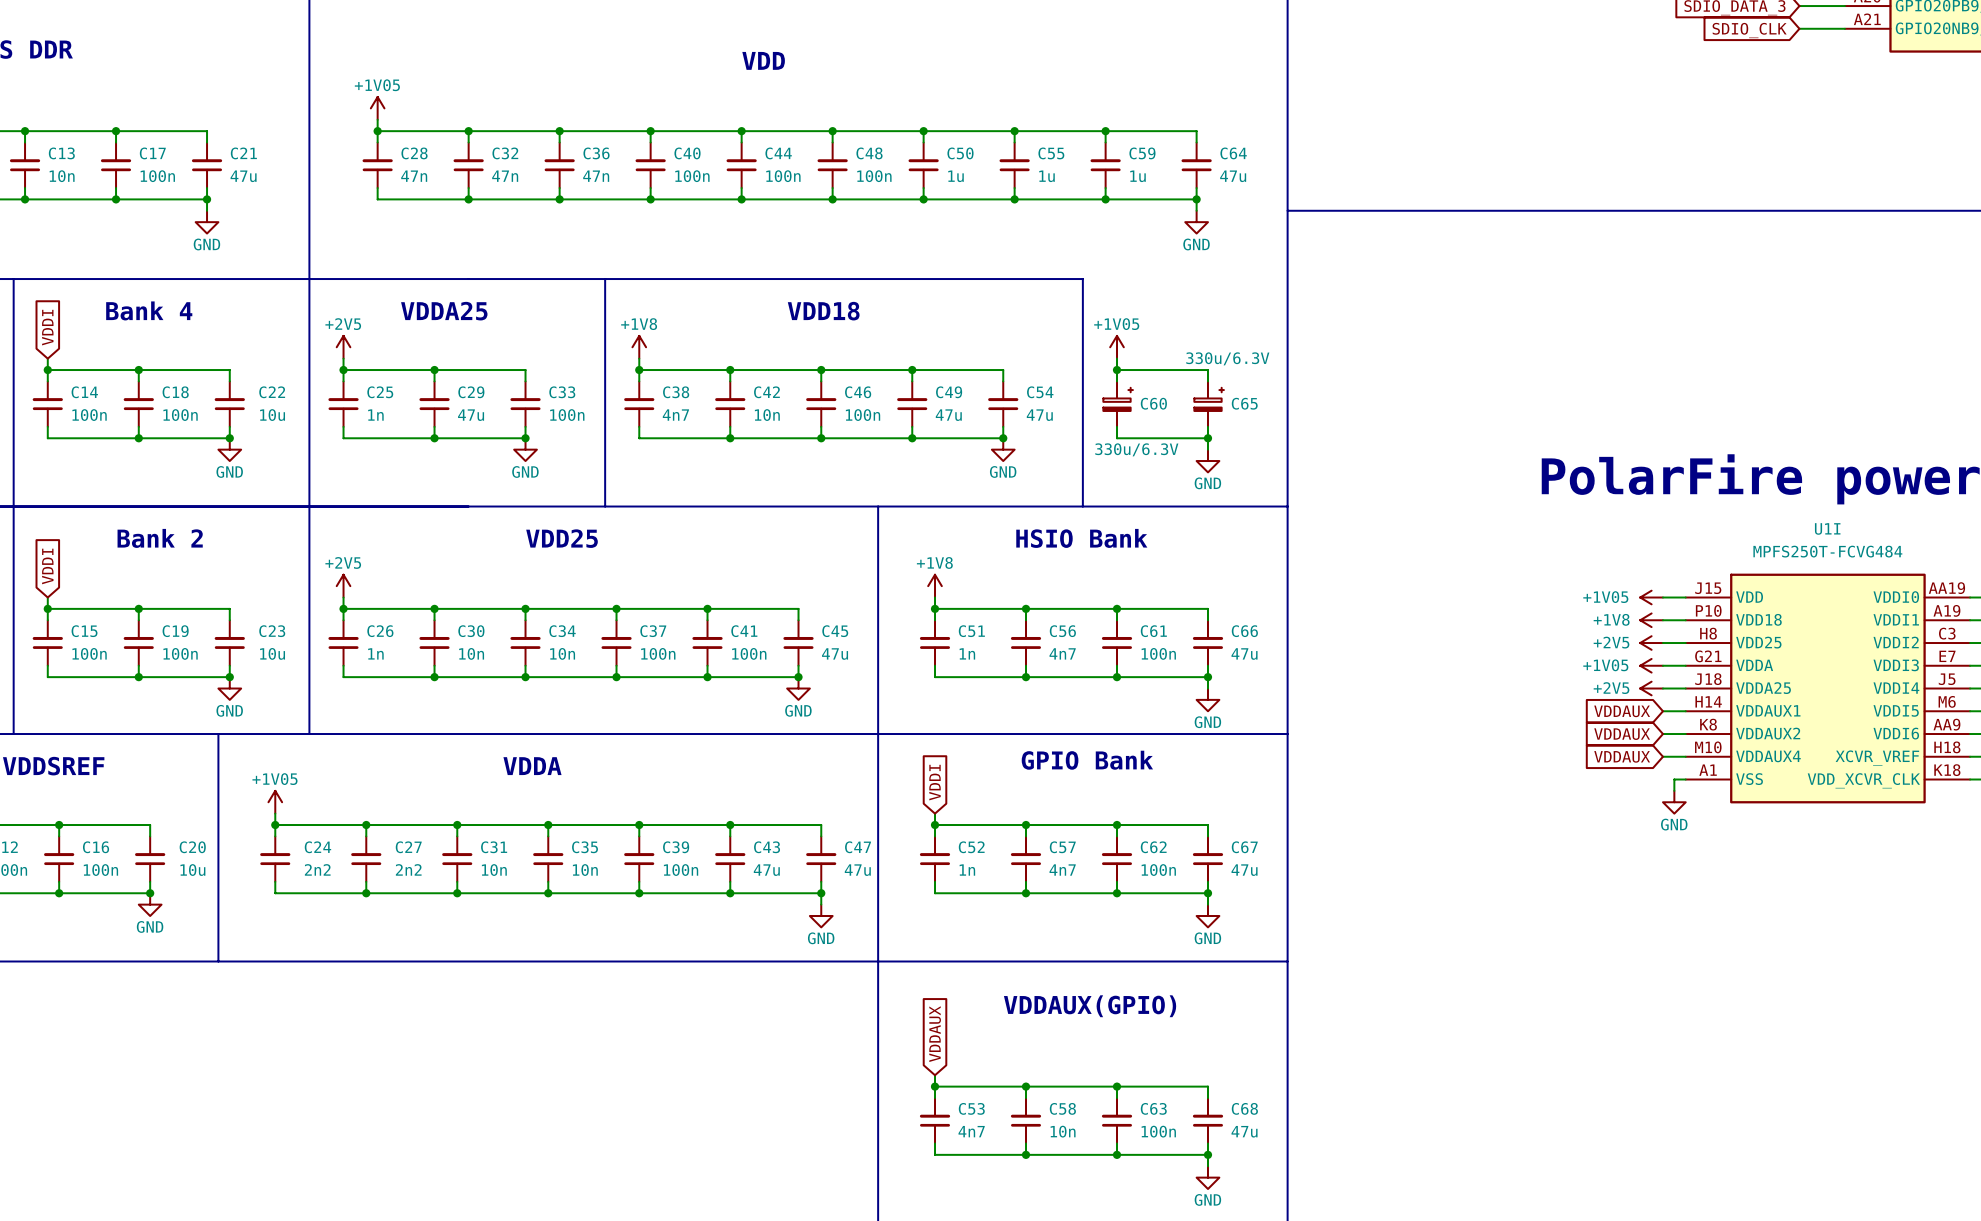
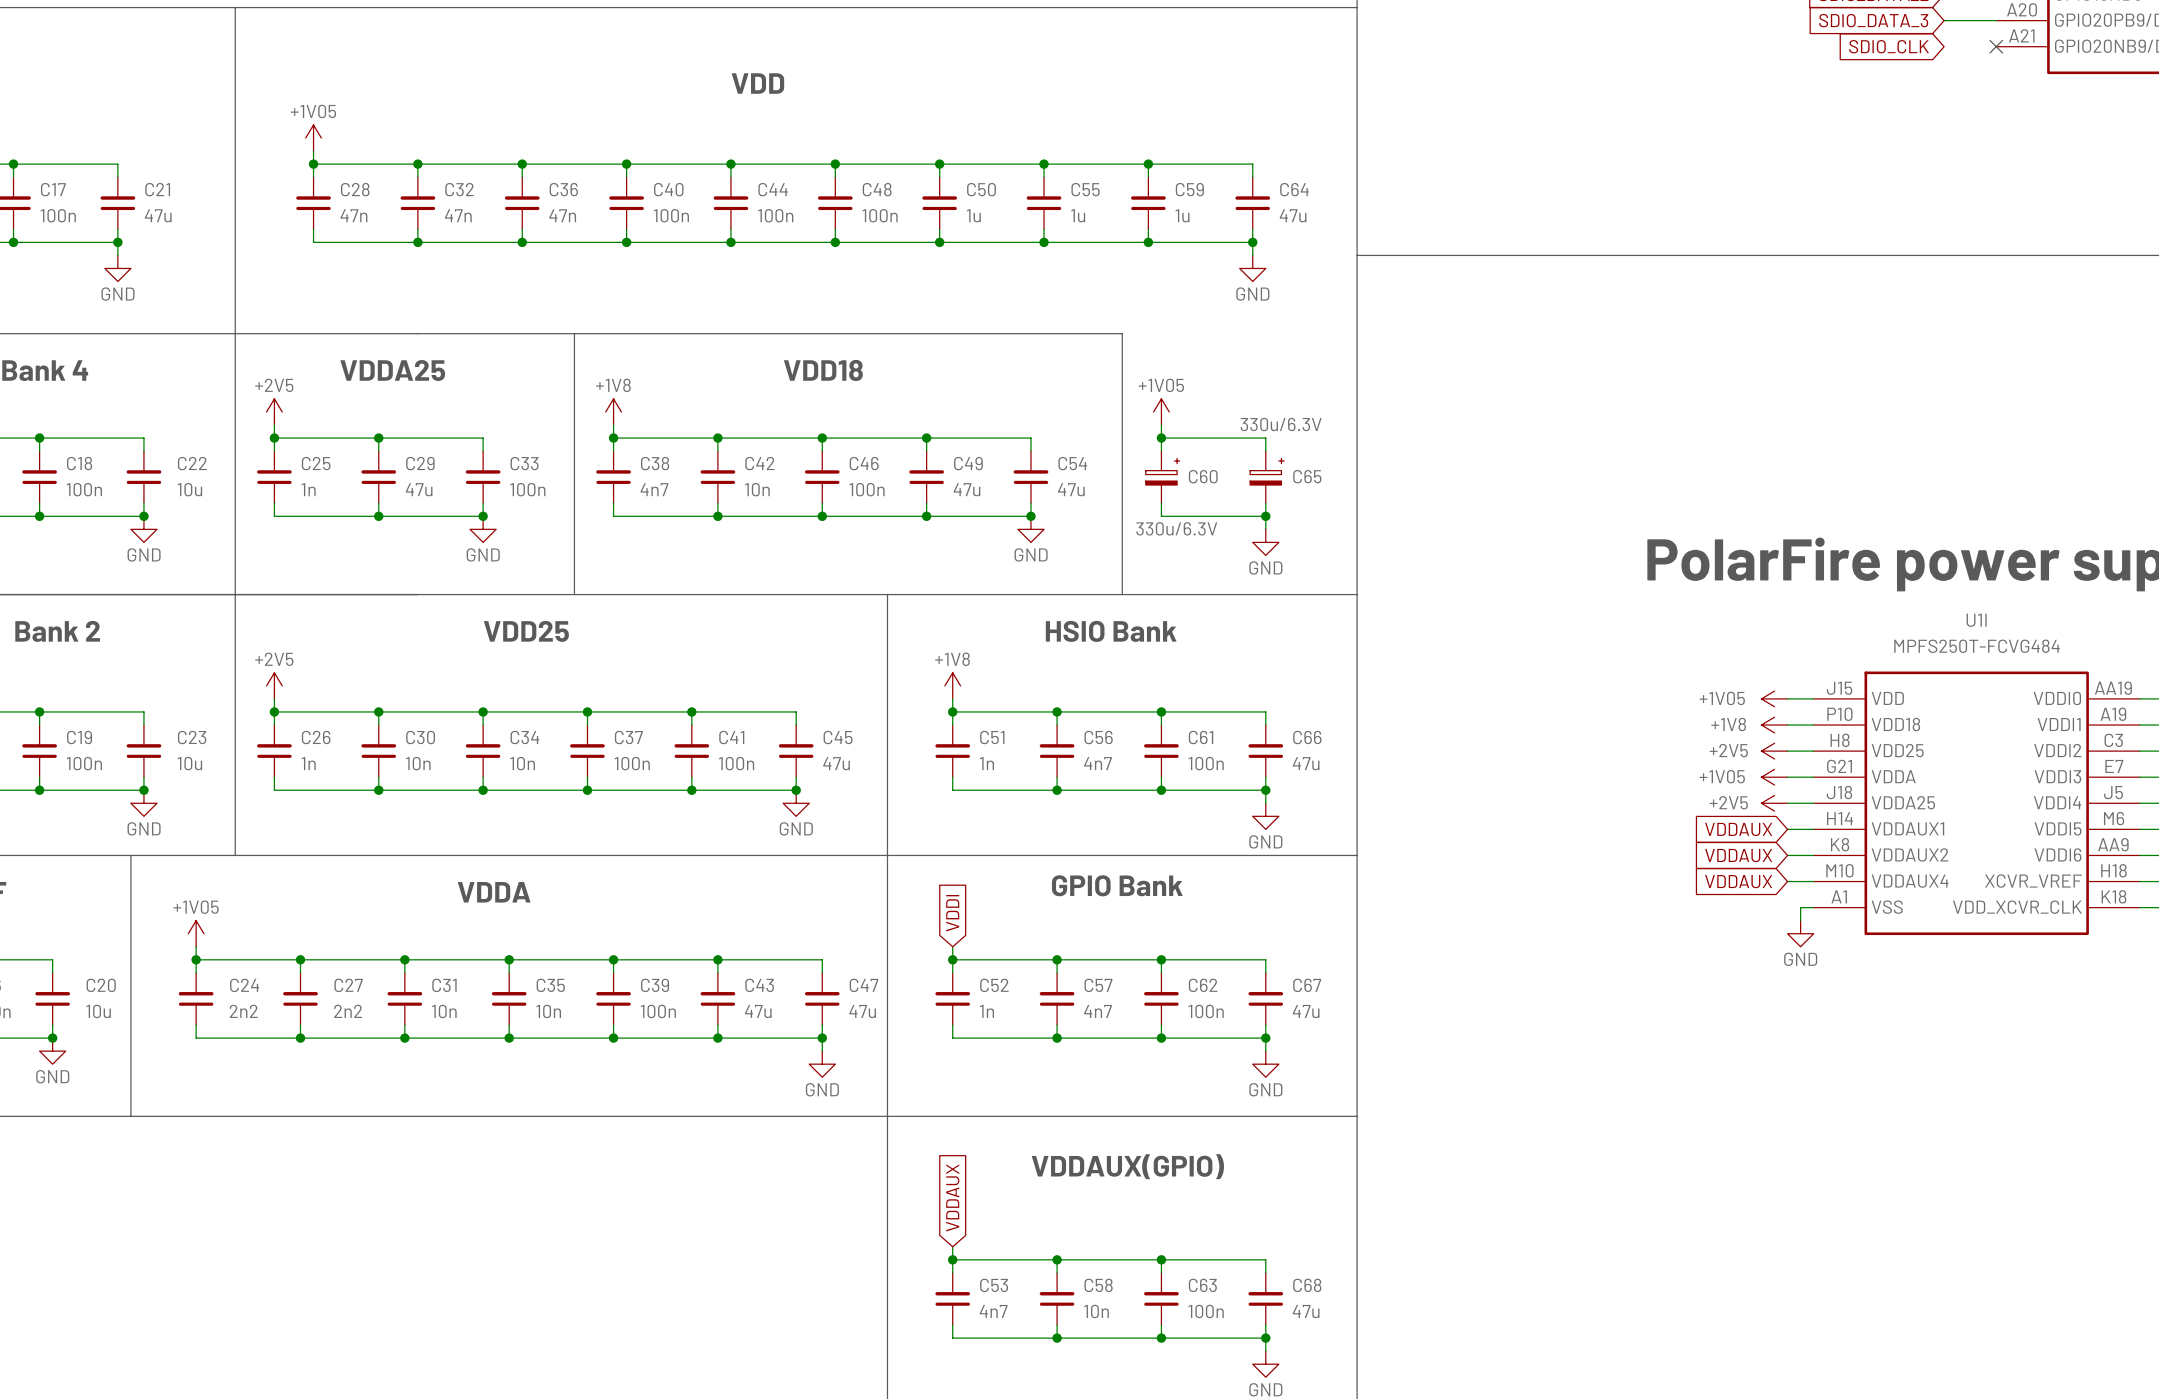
wire: (1799, 28) (1844, 28) -> none
no-connect mark: none -> (1996, 46)

